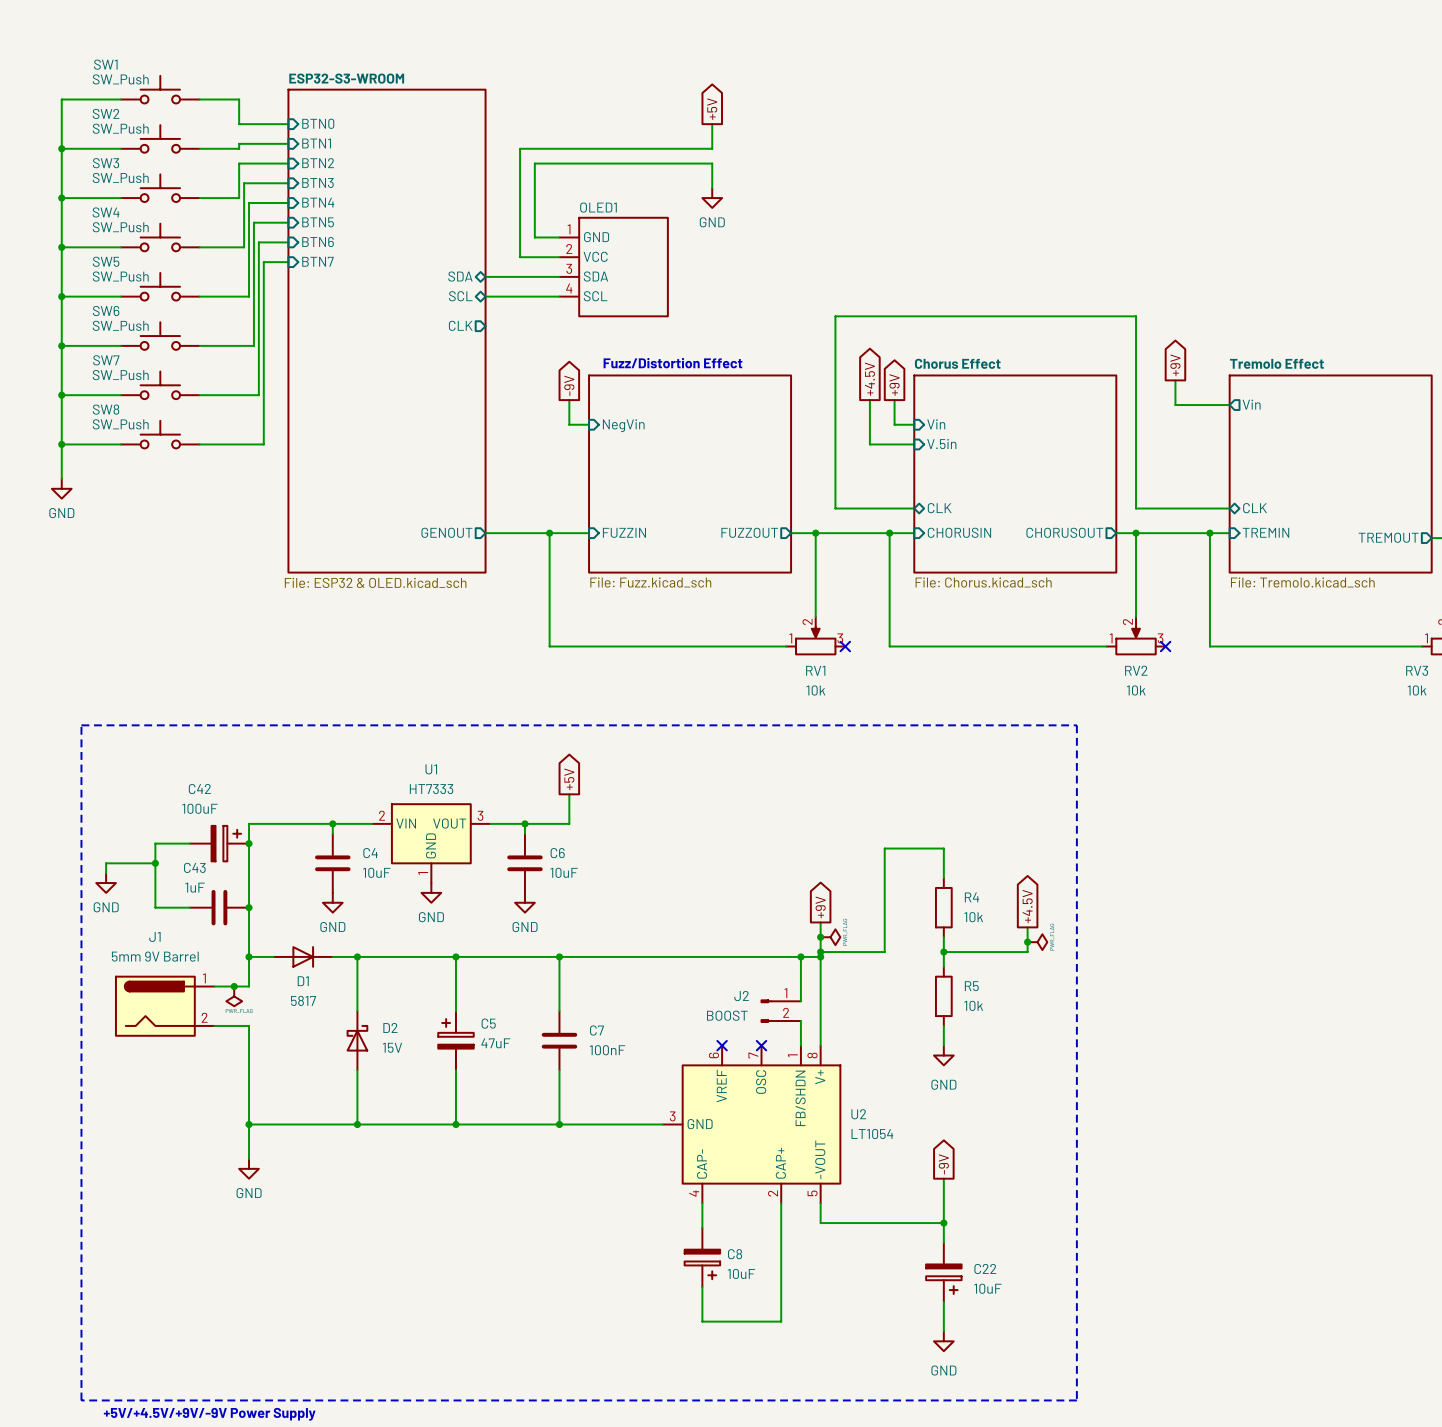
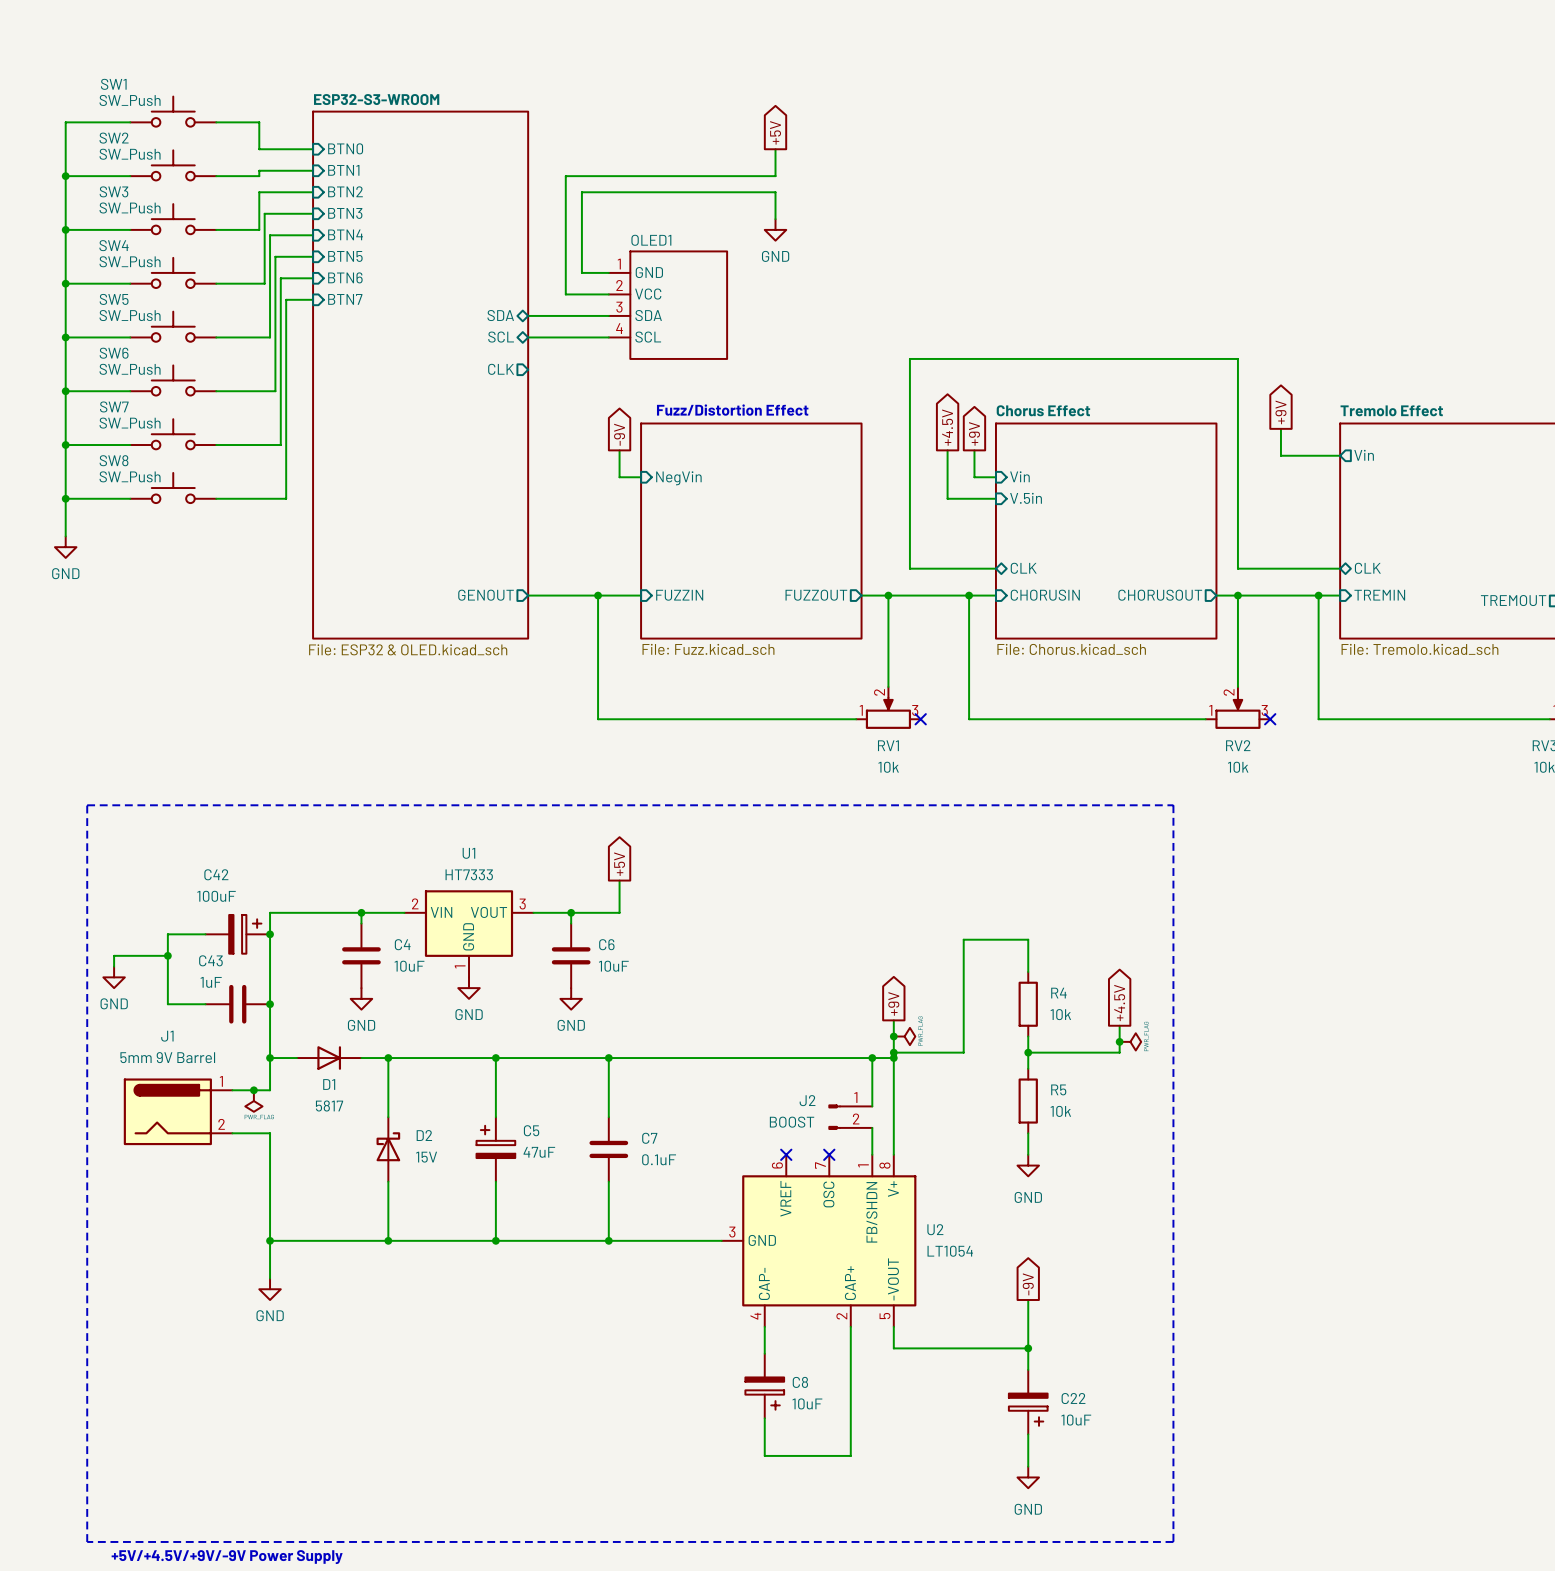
C7 value: 100nF (607, 1050) -> 0.1uF (659, 1159)

